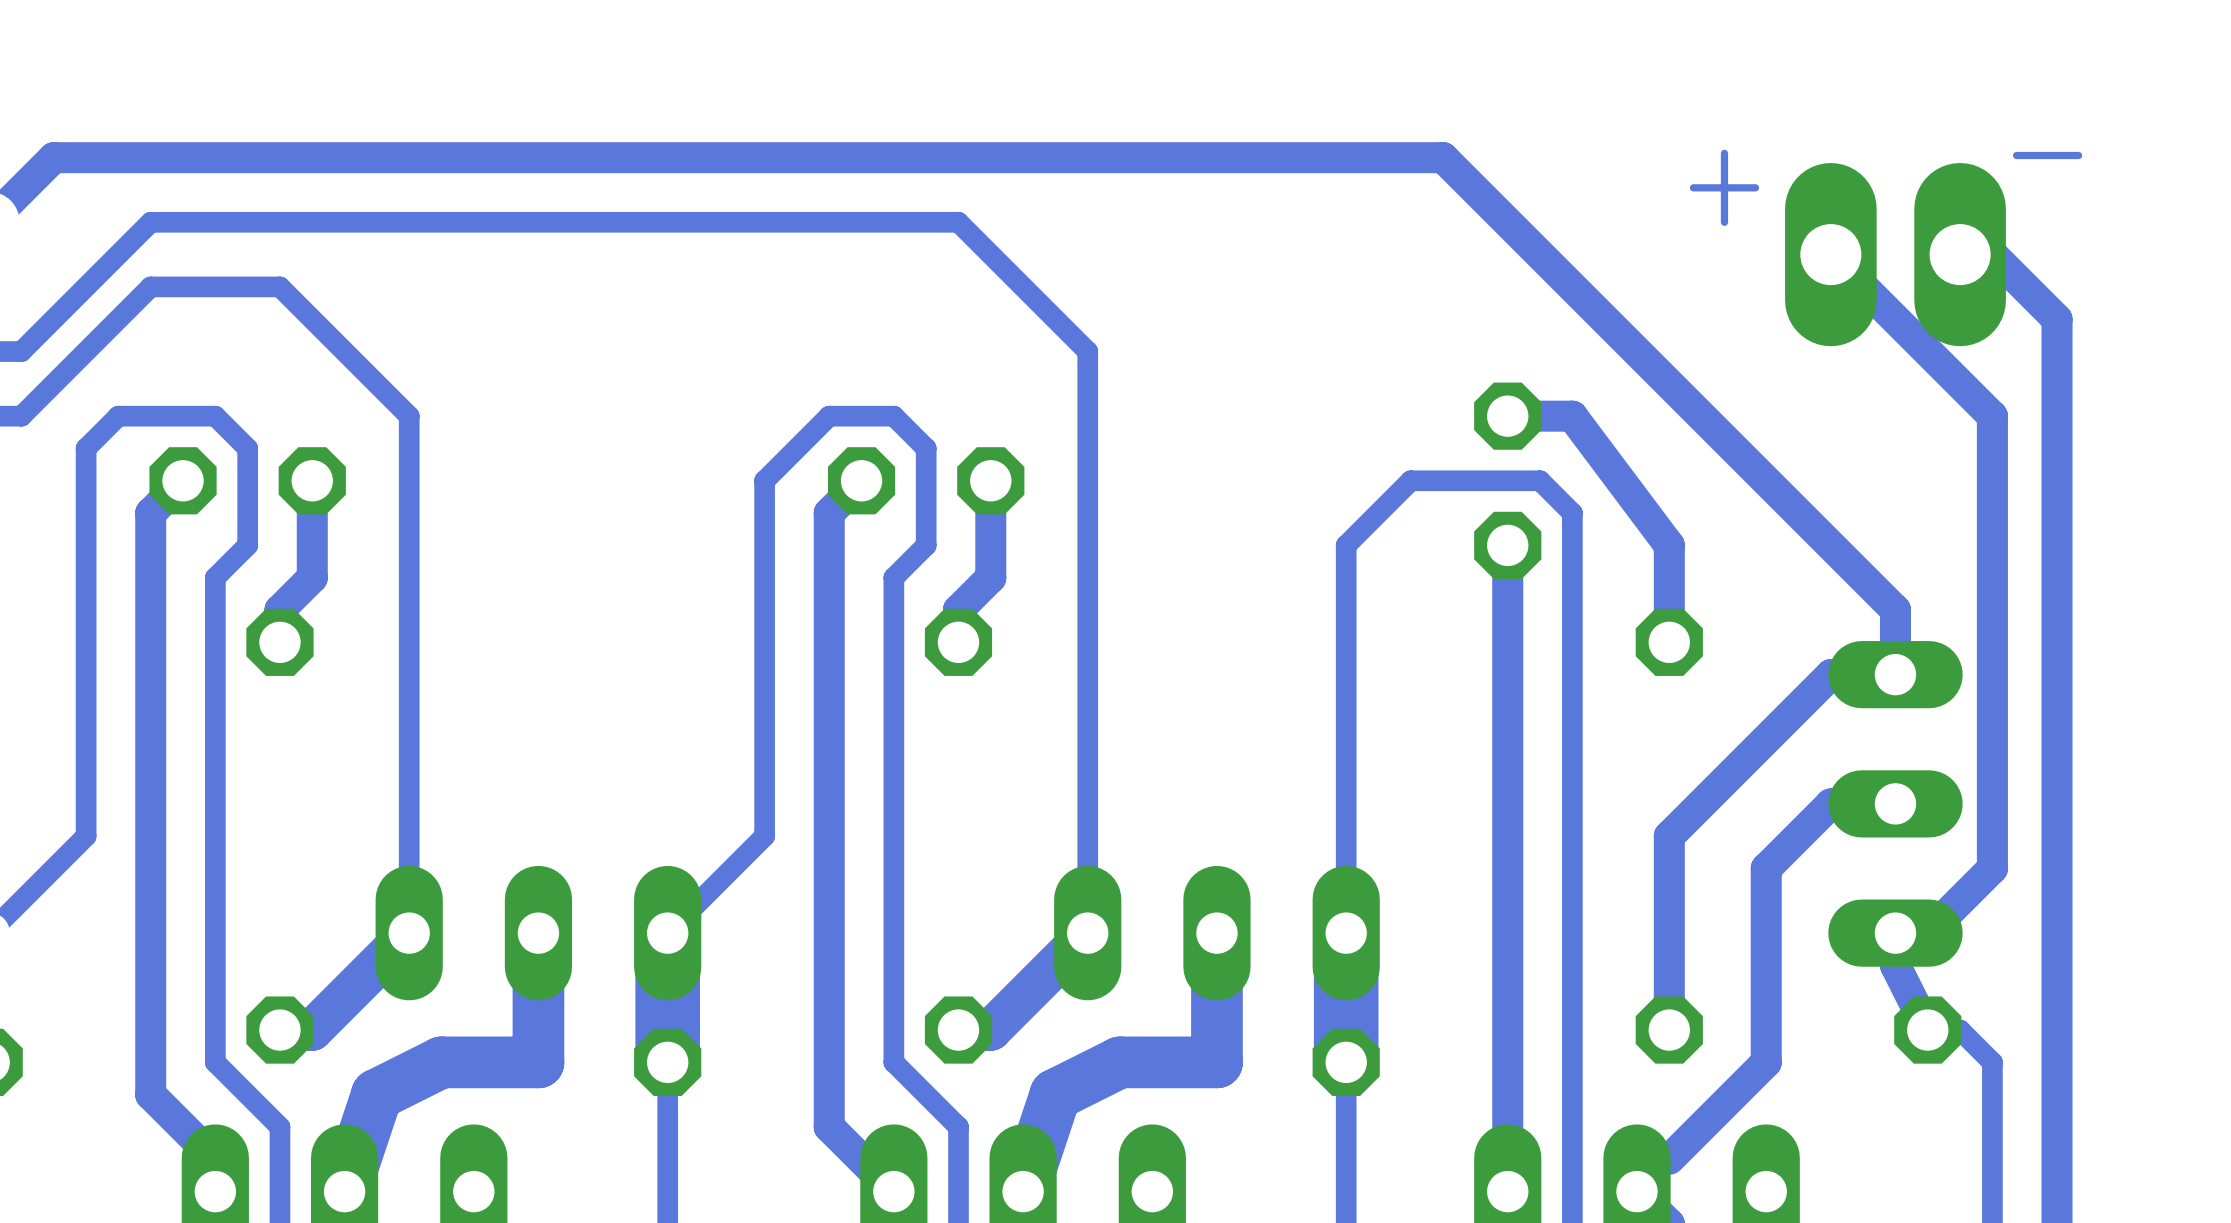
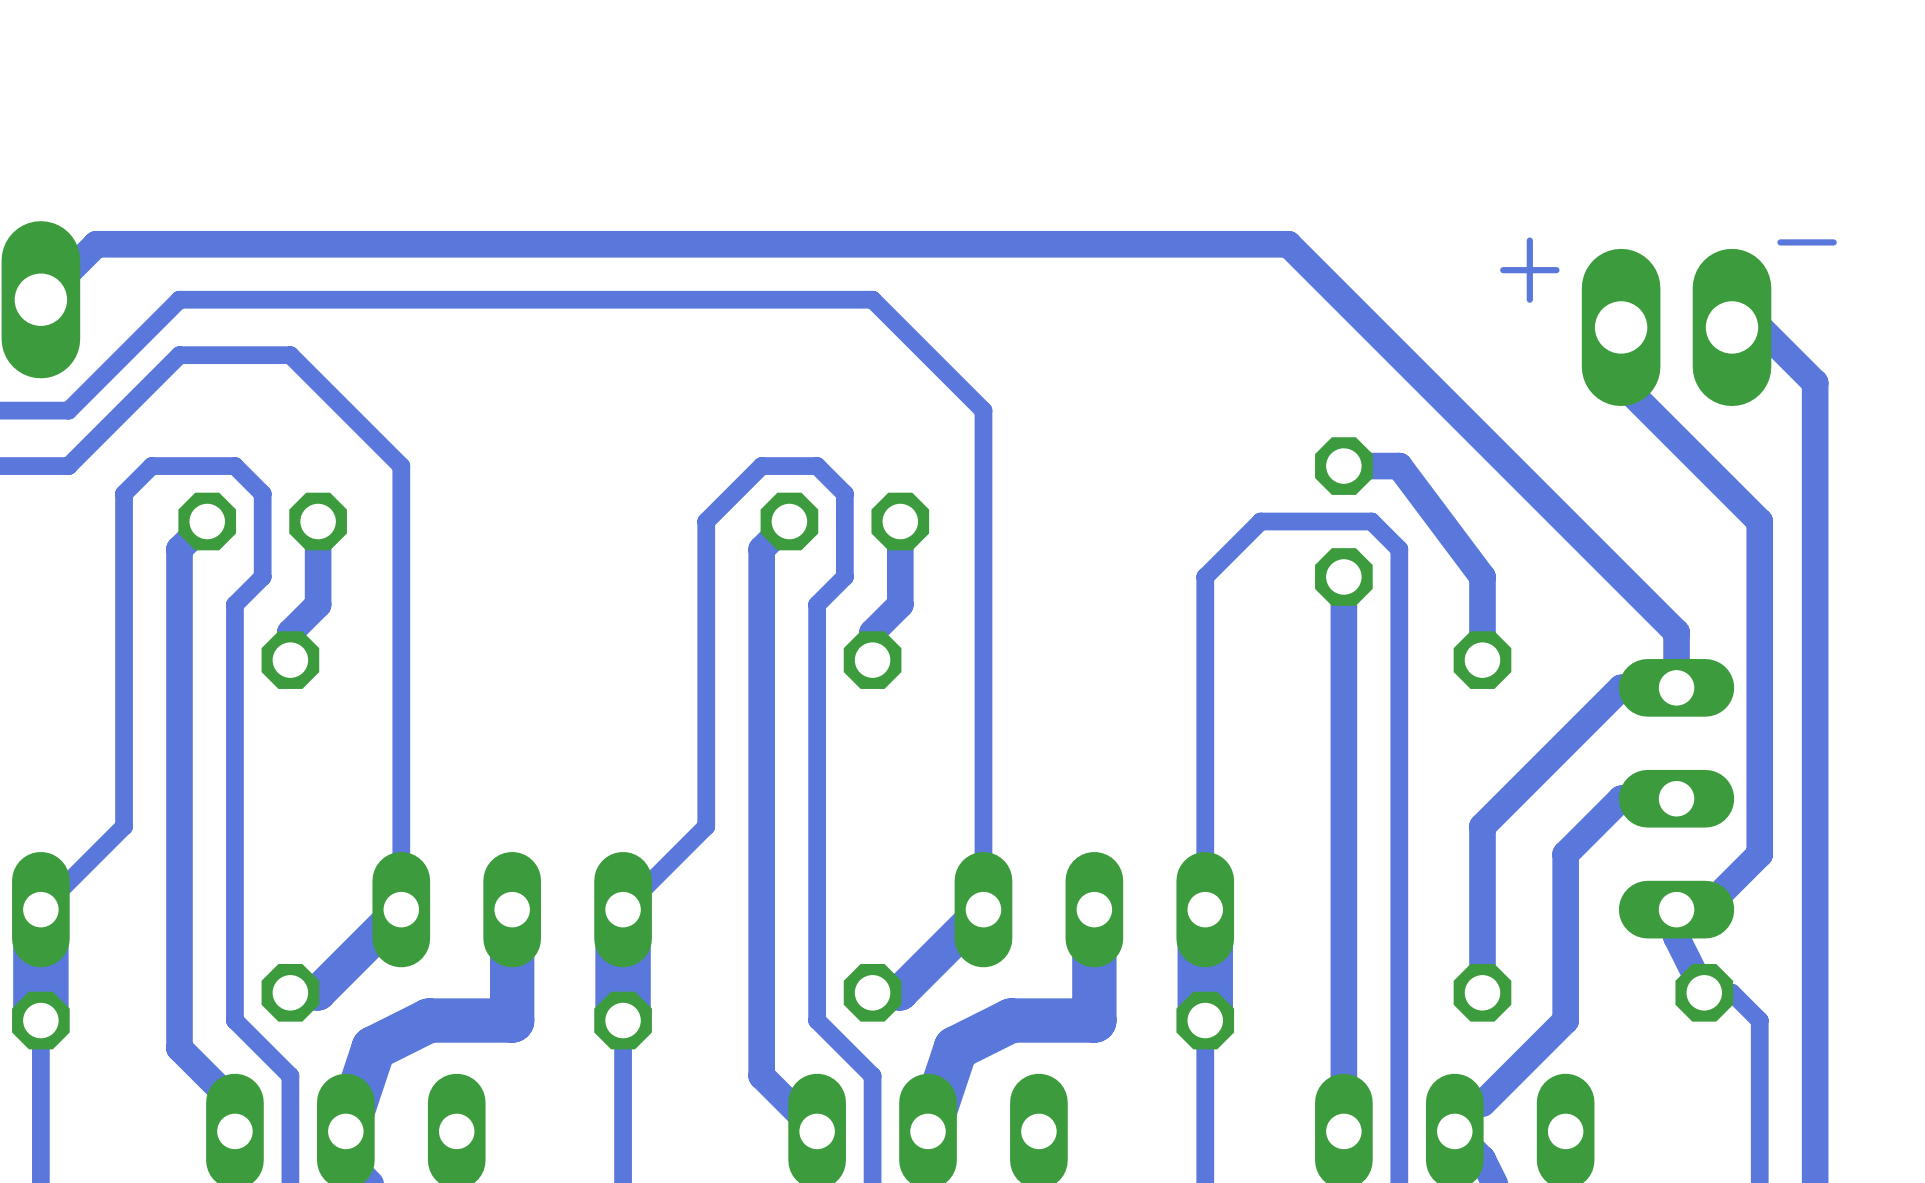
track: (1830, 254) (1992, 416) (1992, 480) -> (1621, 327) (1621, 382) (1759, 521)

